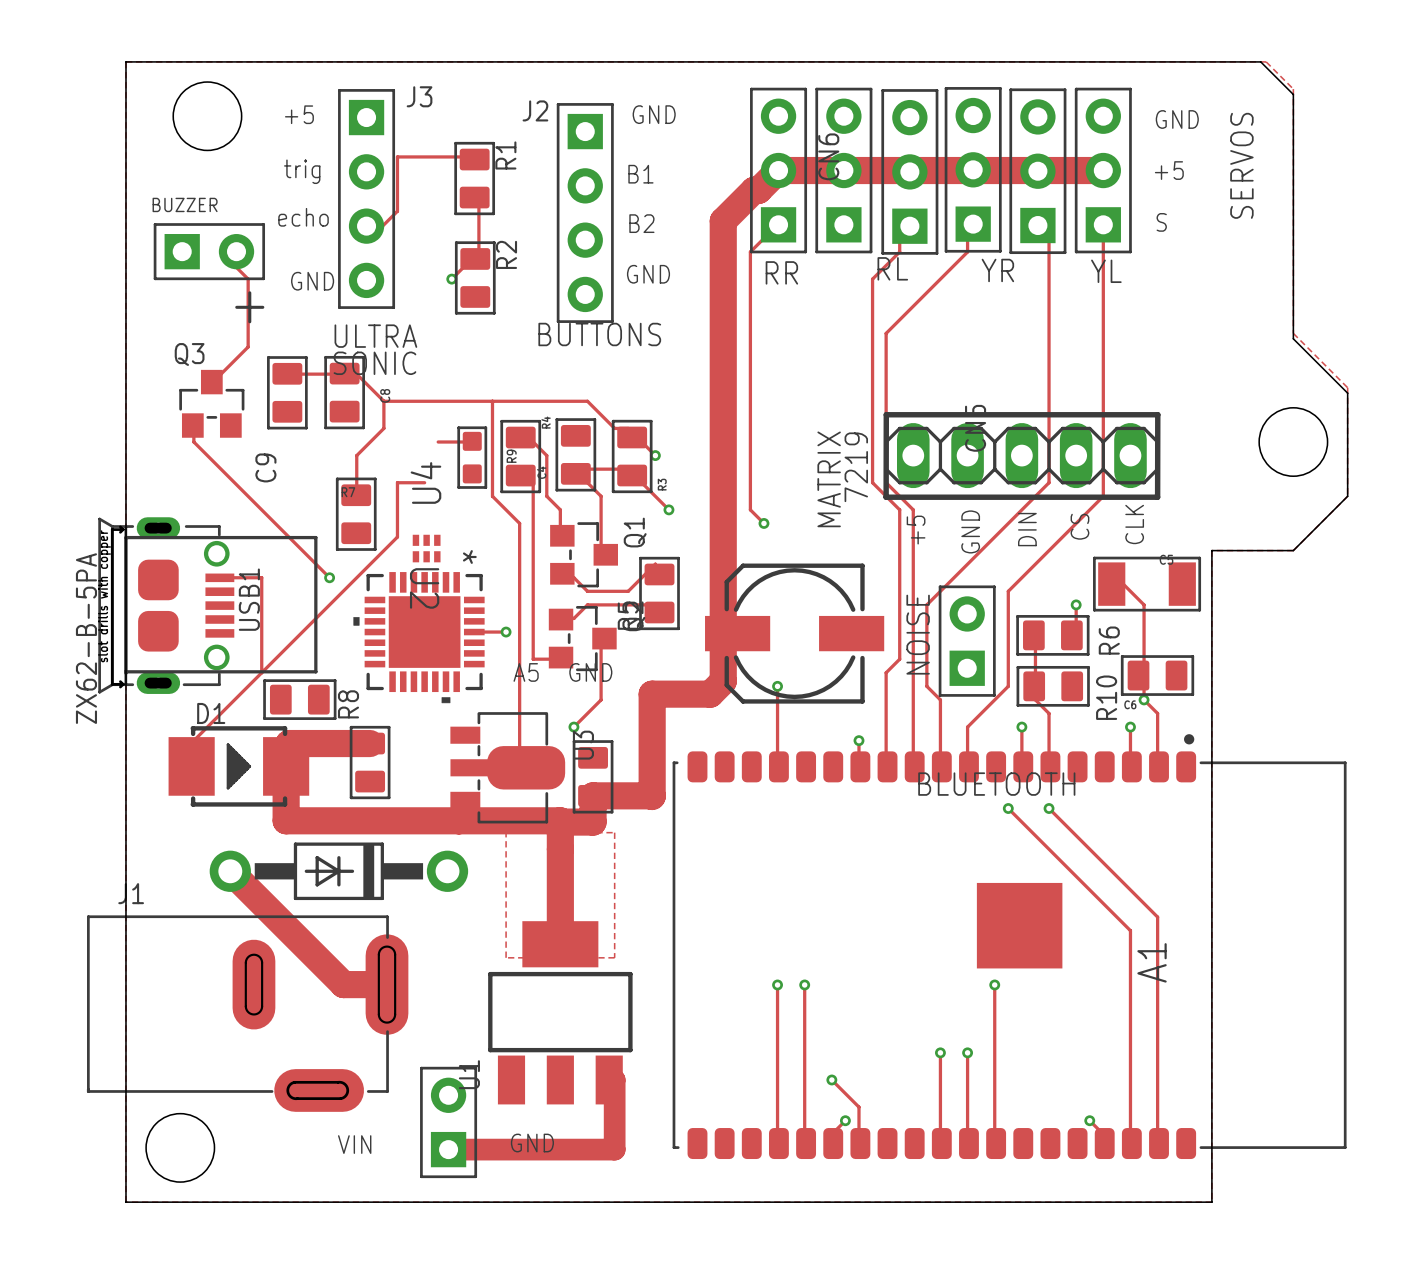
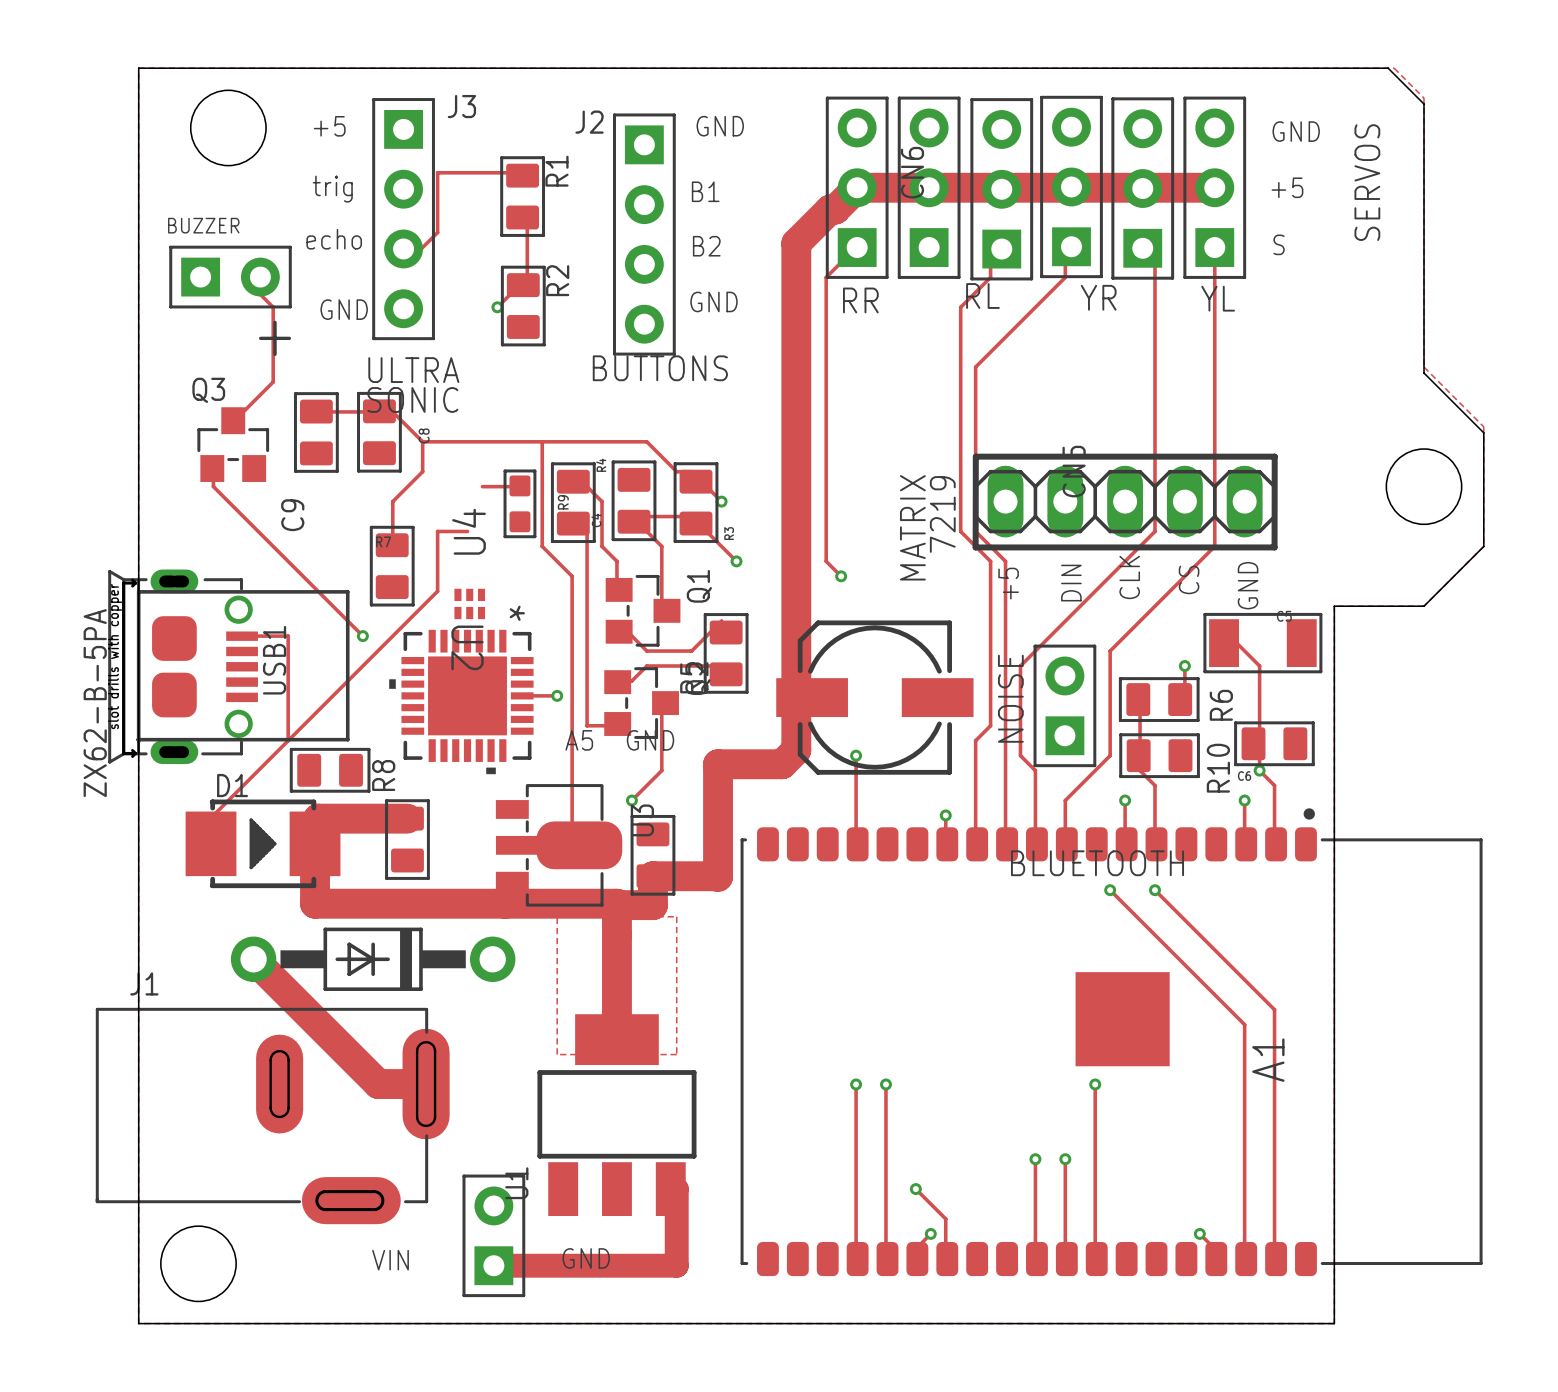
text position: CLK (1134, 524) -> CLK (1129, 577)
text position: DIN (1027, 529) -> DIN (1071, 583)
text position: GND (970, 531) -> GND (1248, 585)

